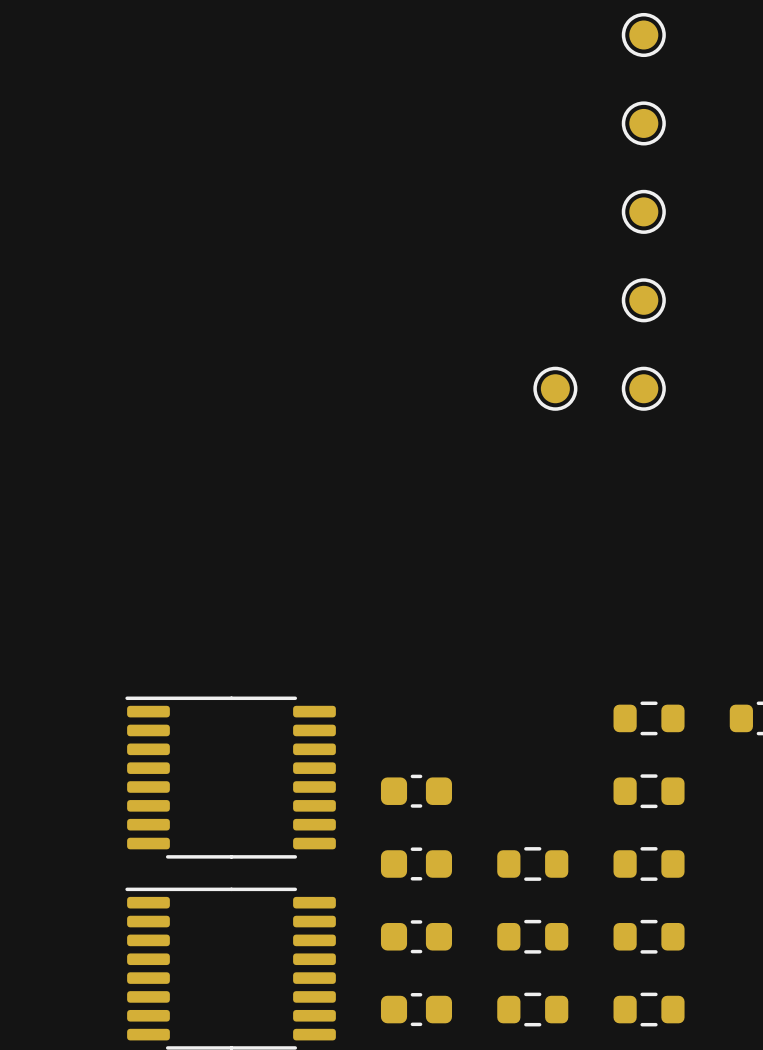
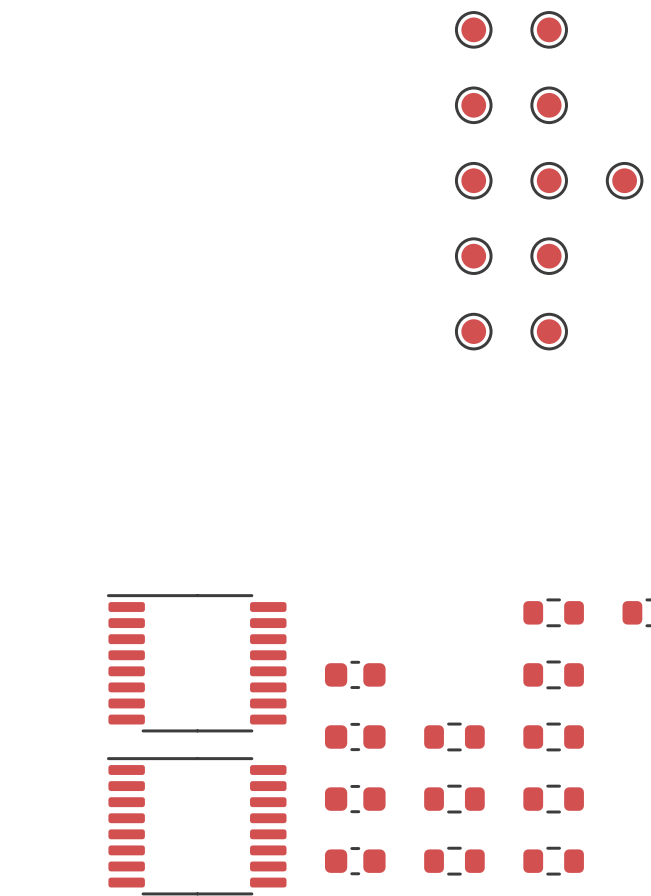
part: none -> (473, 29)
part: none -> (473, 105)
part: none -> (473, 180)
part: none -> (624, 180)
part: none -> (473, 256)

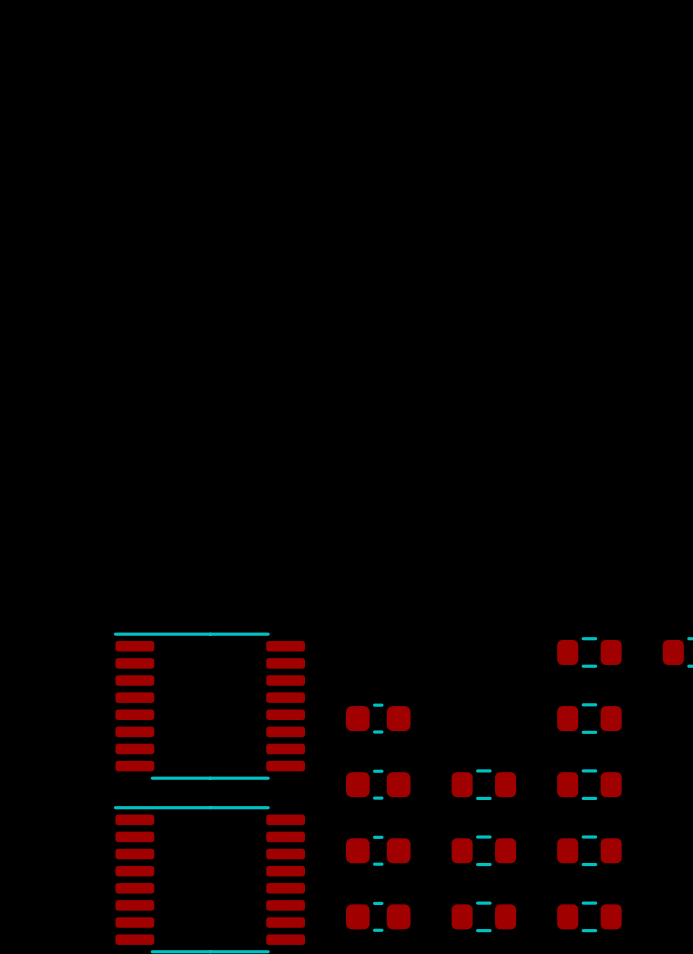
part: (473, 29) -> none
part: (549, 29) -> none
part: (473, 105) -> none
part: (549, 105) -> none
part: (473, 180) -> none
part: (549, 180) -> none
part: (624, 180) -> none
part: (473, 256) -> none
part: (549, 256) -> none
part: (473, 331) -> none
part: (549, 331) -> none

